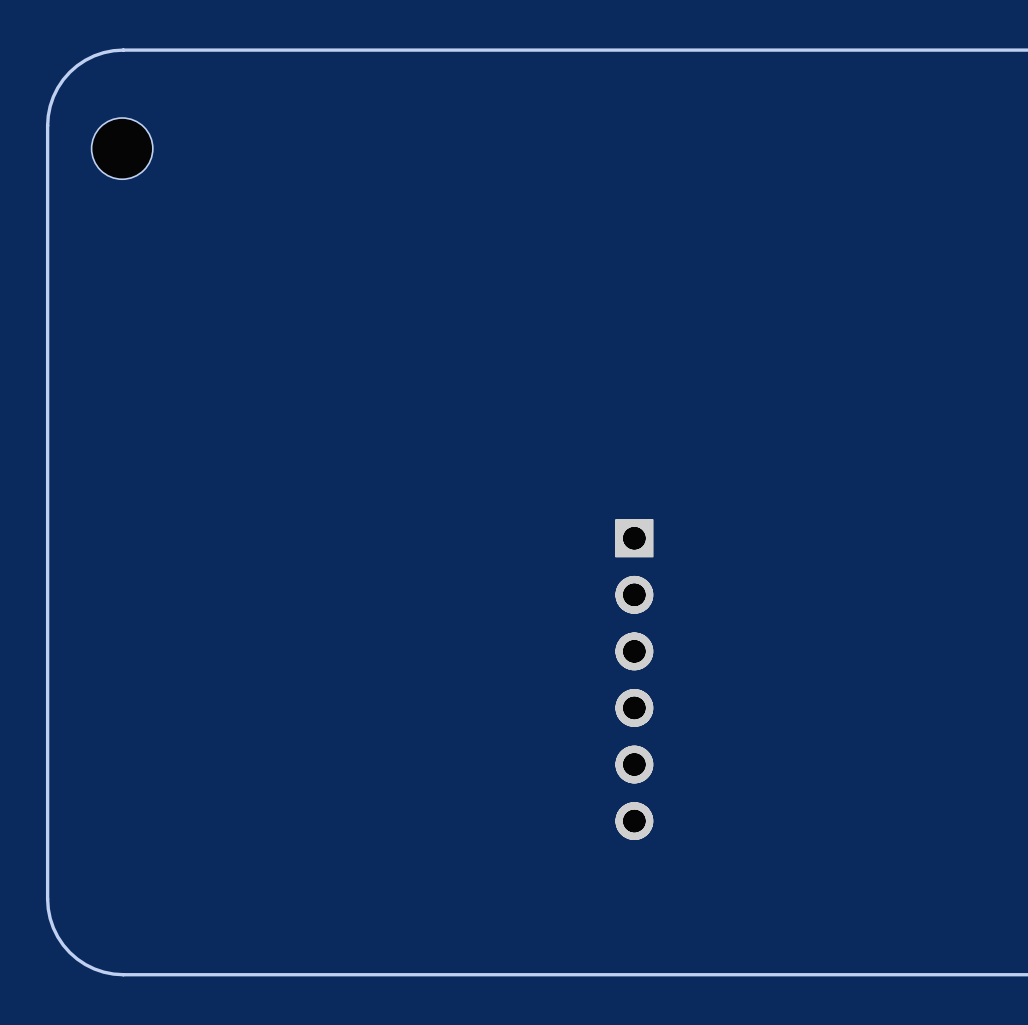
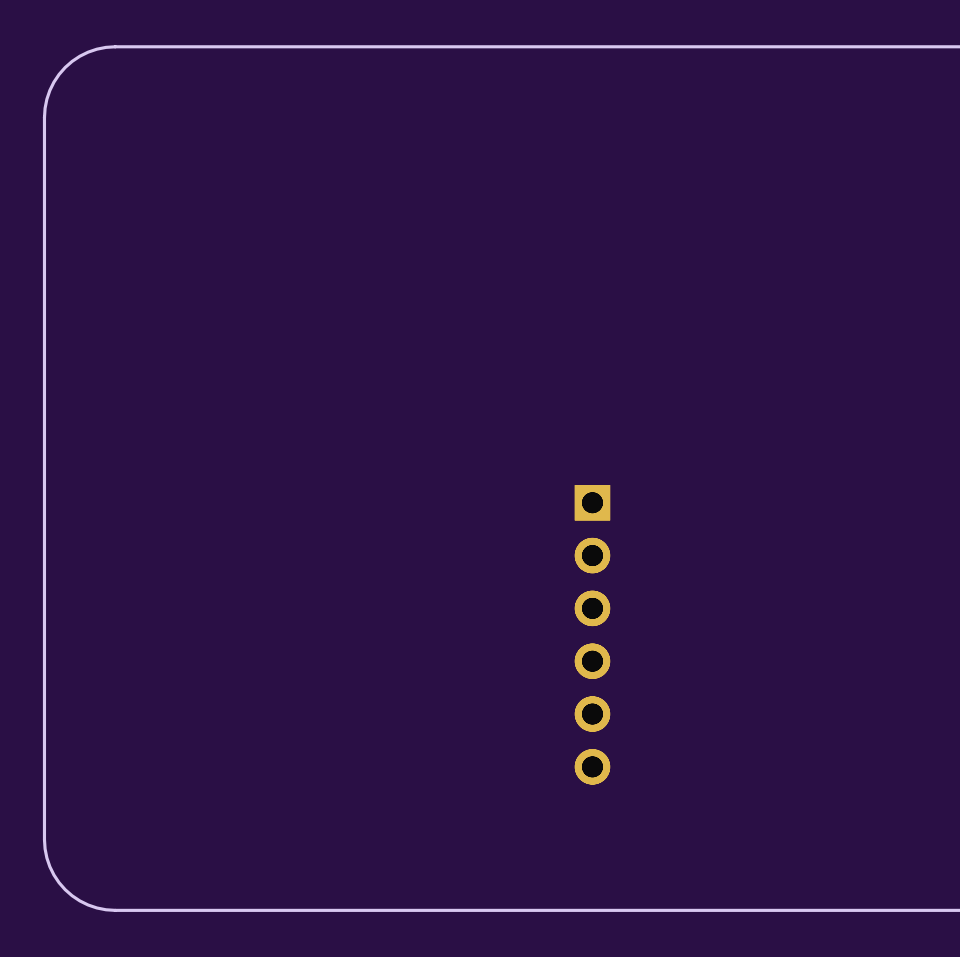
part: (122, 148) -> none

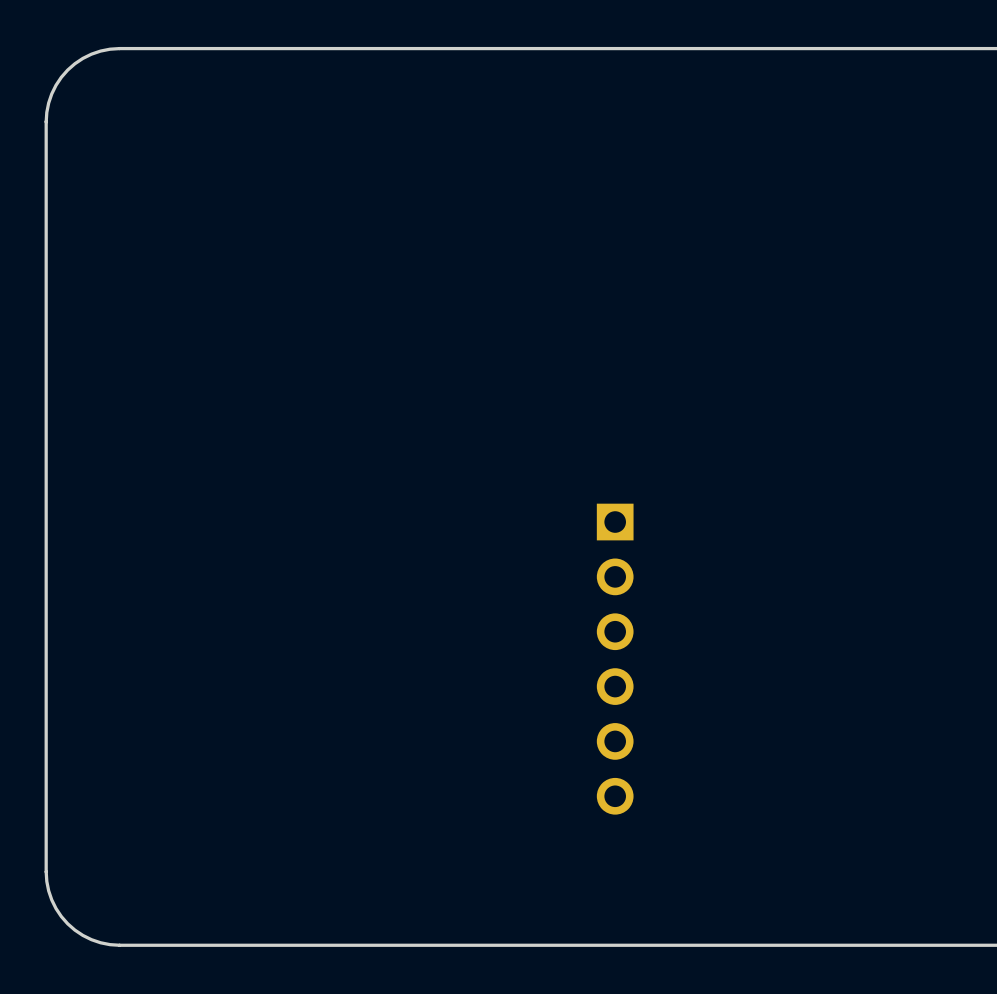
part: (592, 634) -> none

